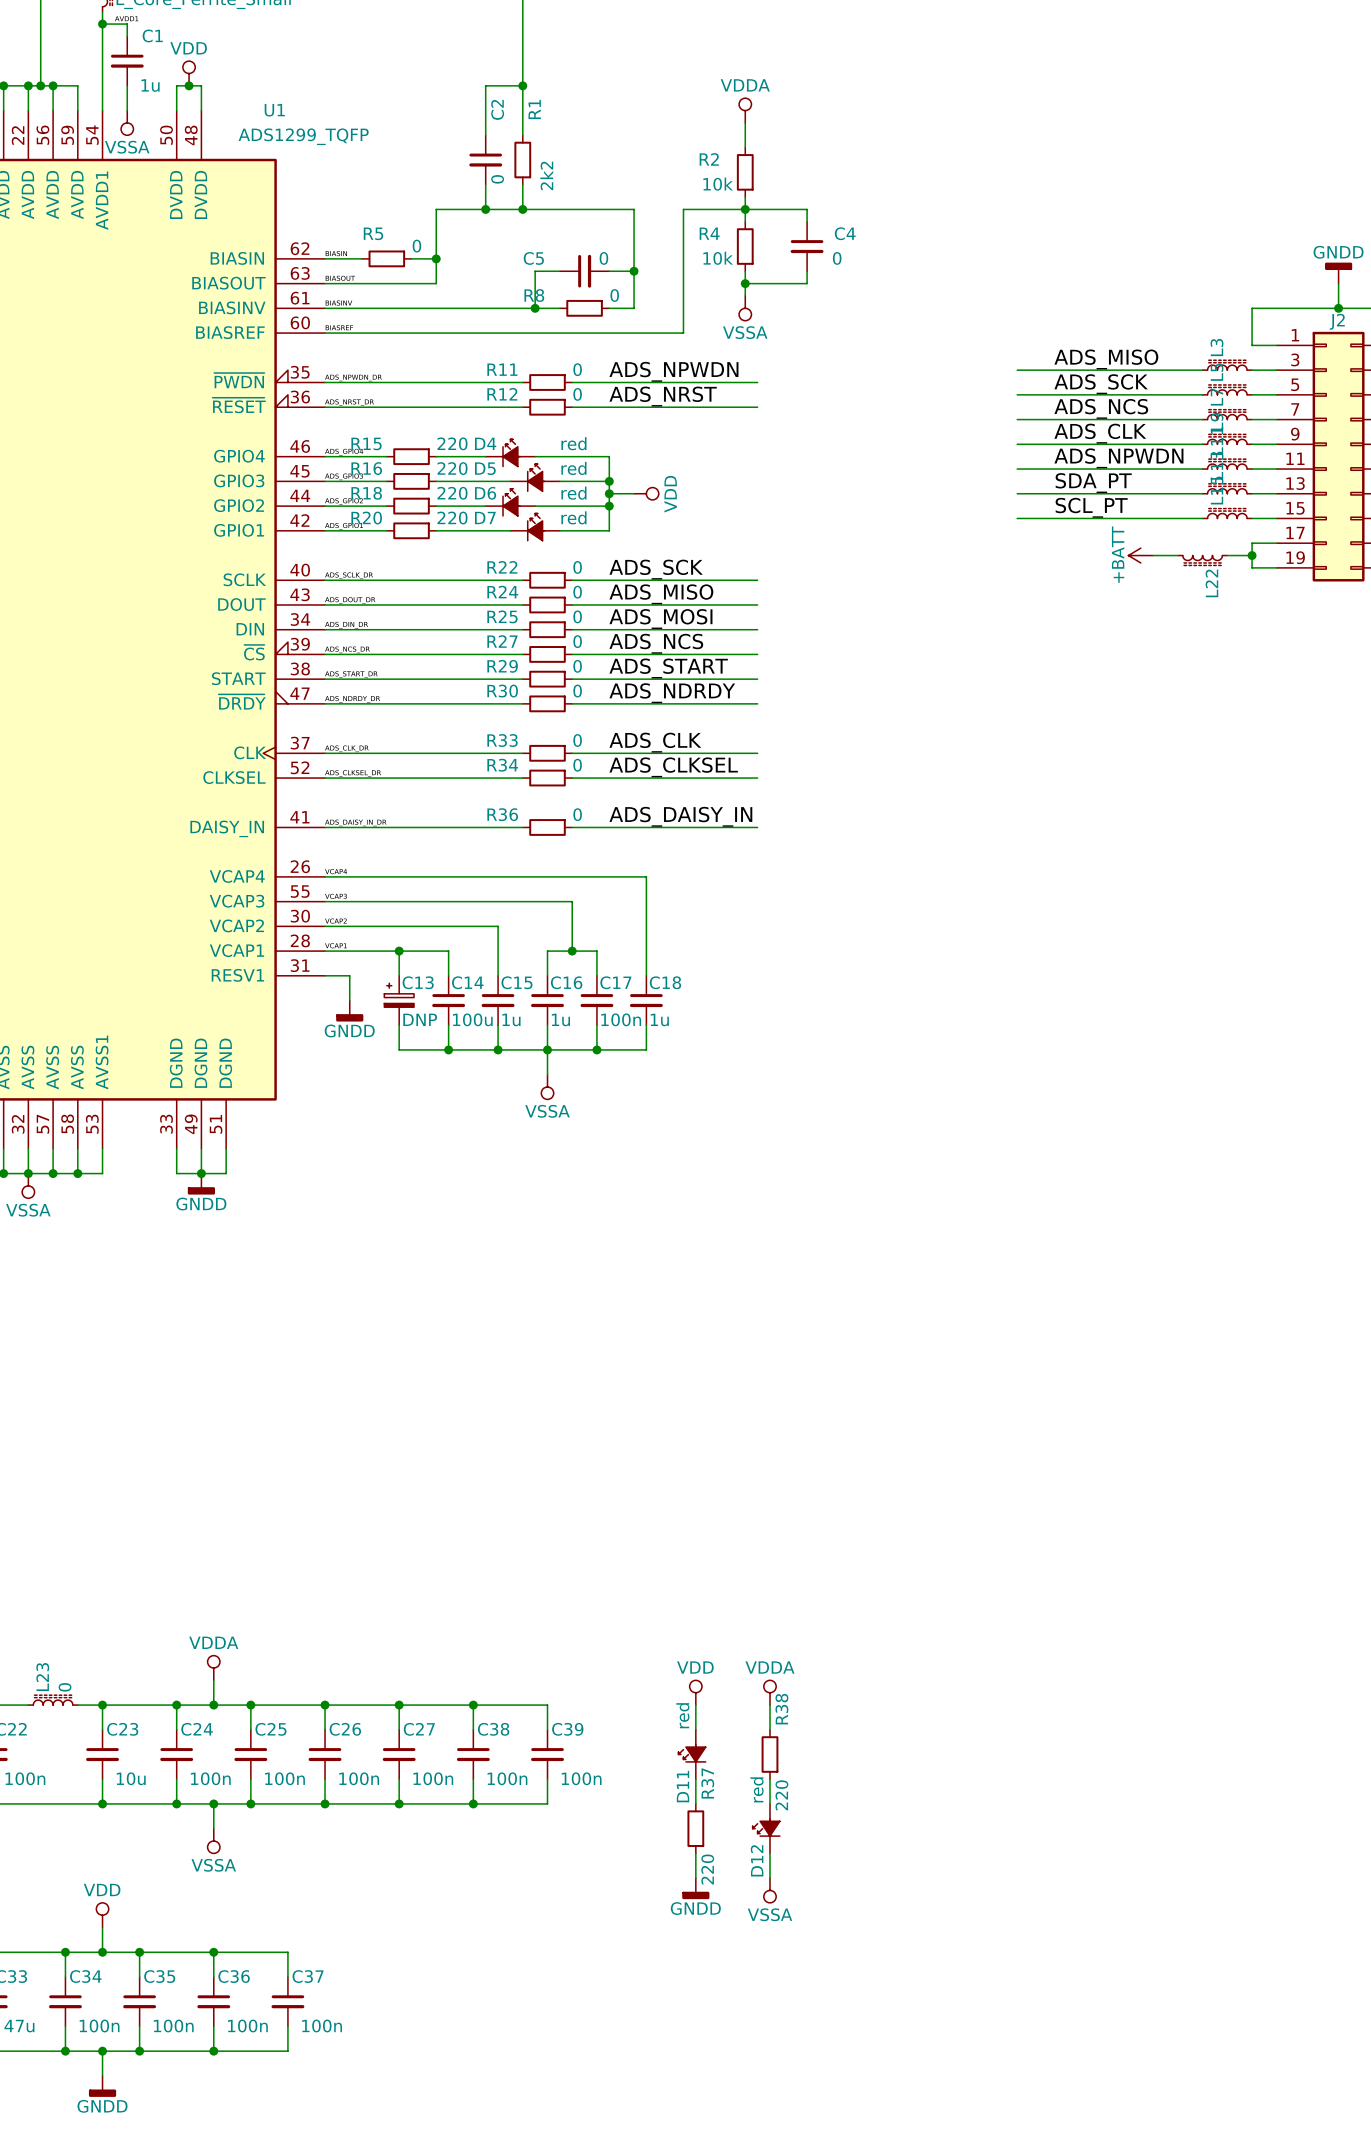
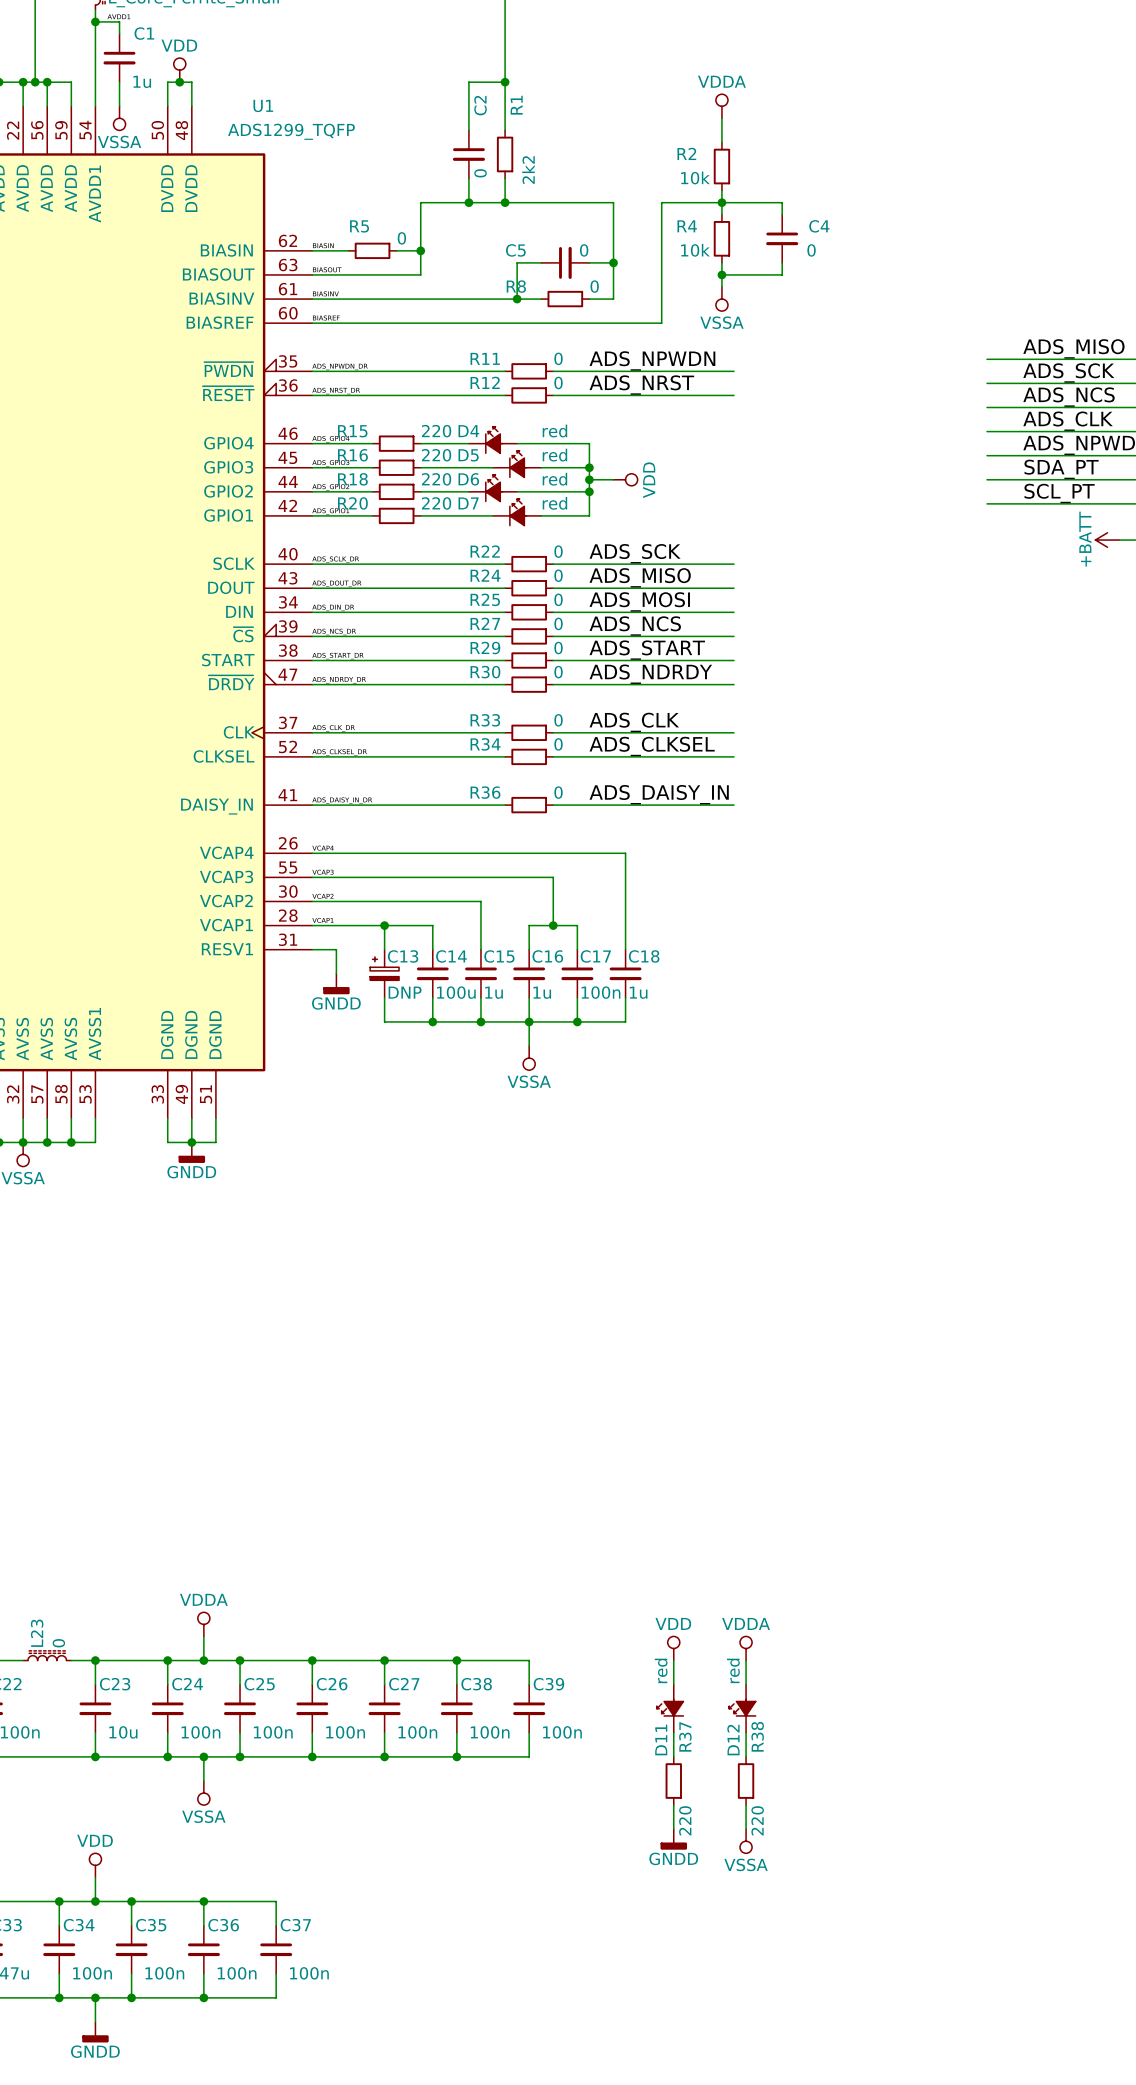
R38 position: (770, 1754) -> (746, 1781)
D12 position: (766, 1828) -> (742, 1708)

